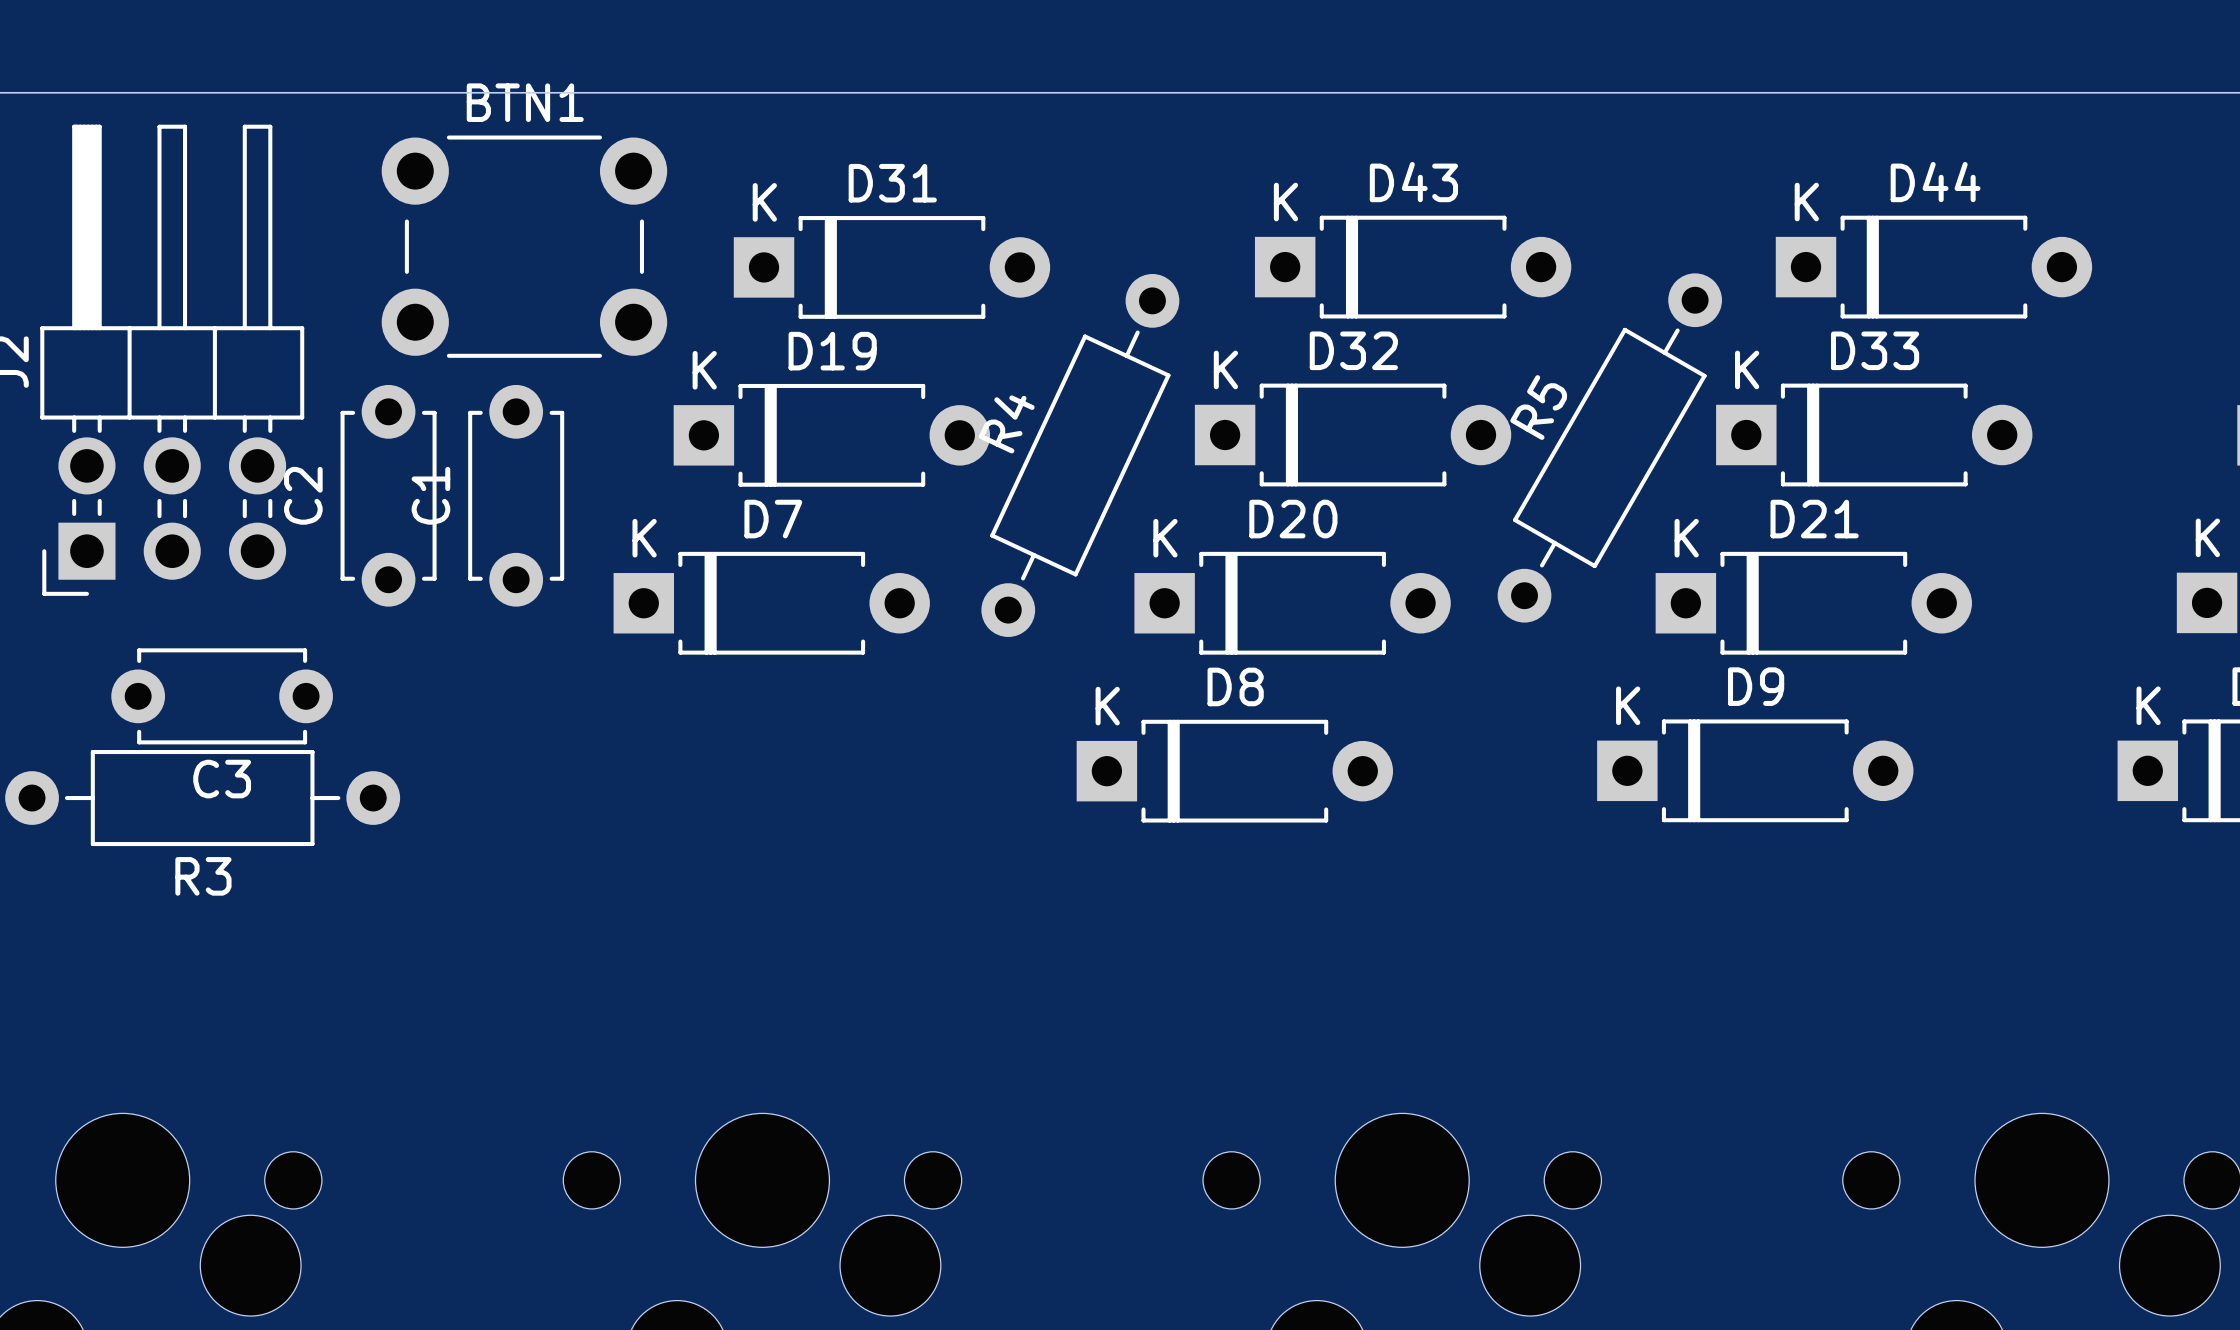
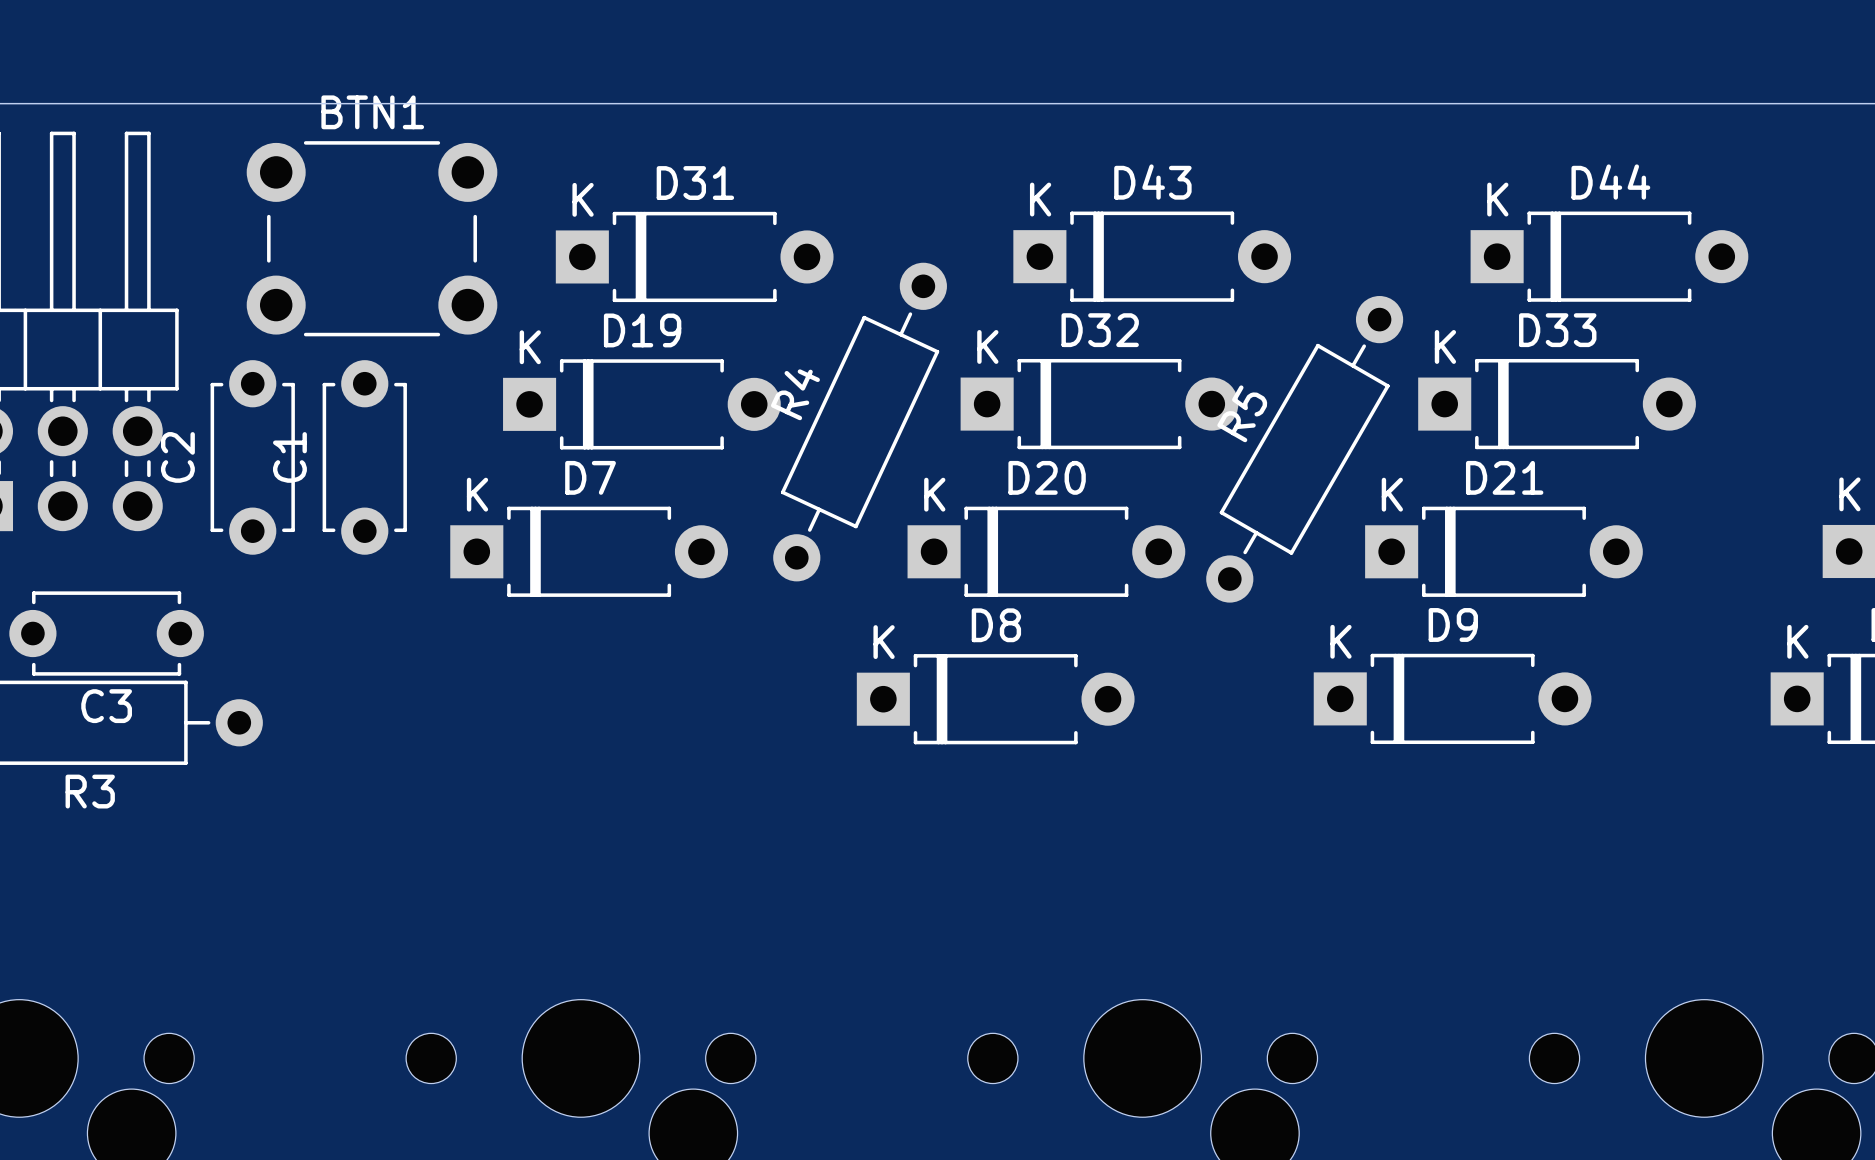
R5 position: (1609, 447) -> (1304, 449)

